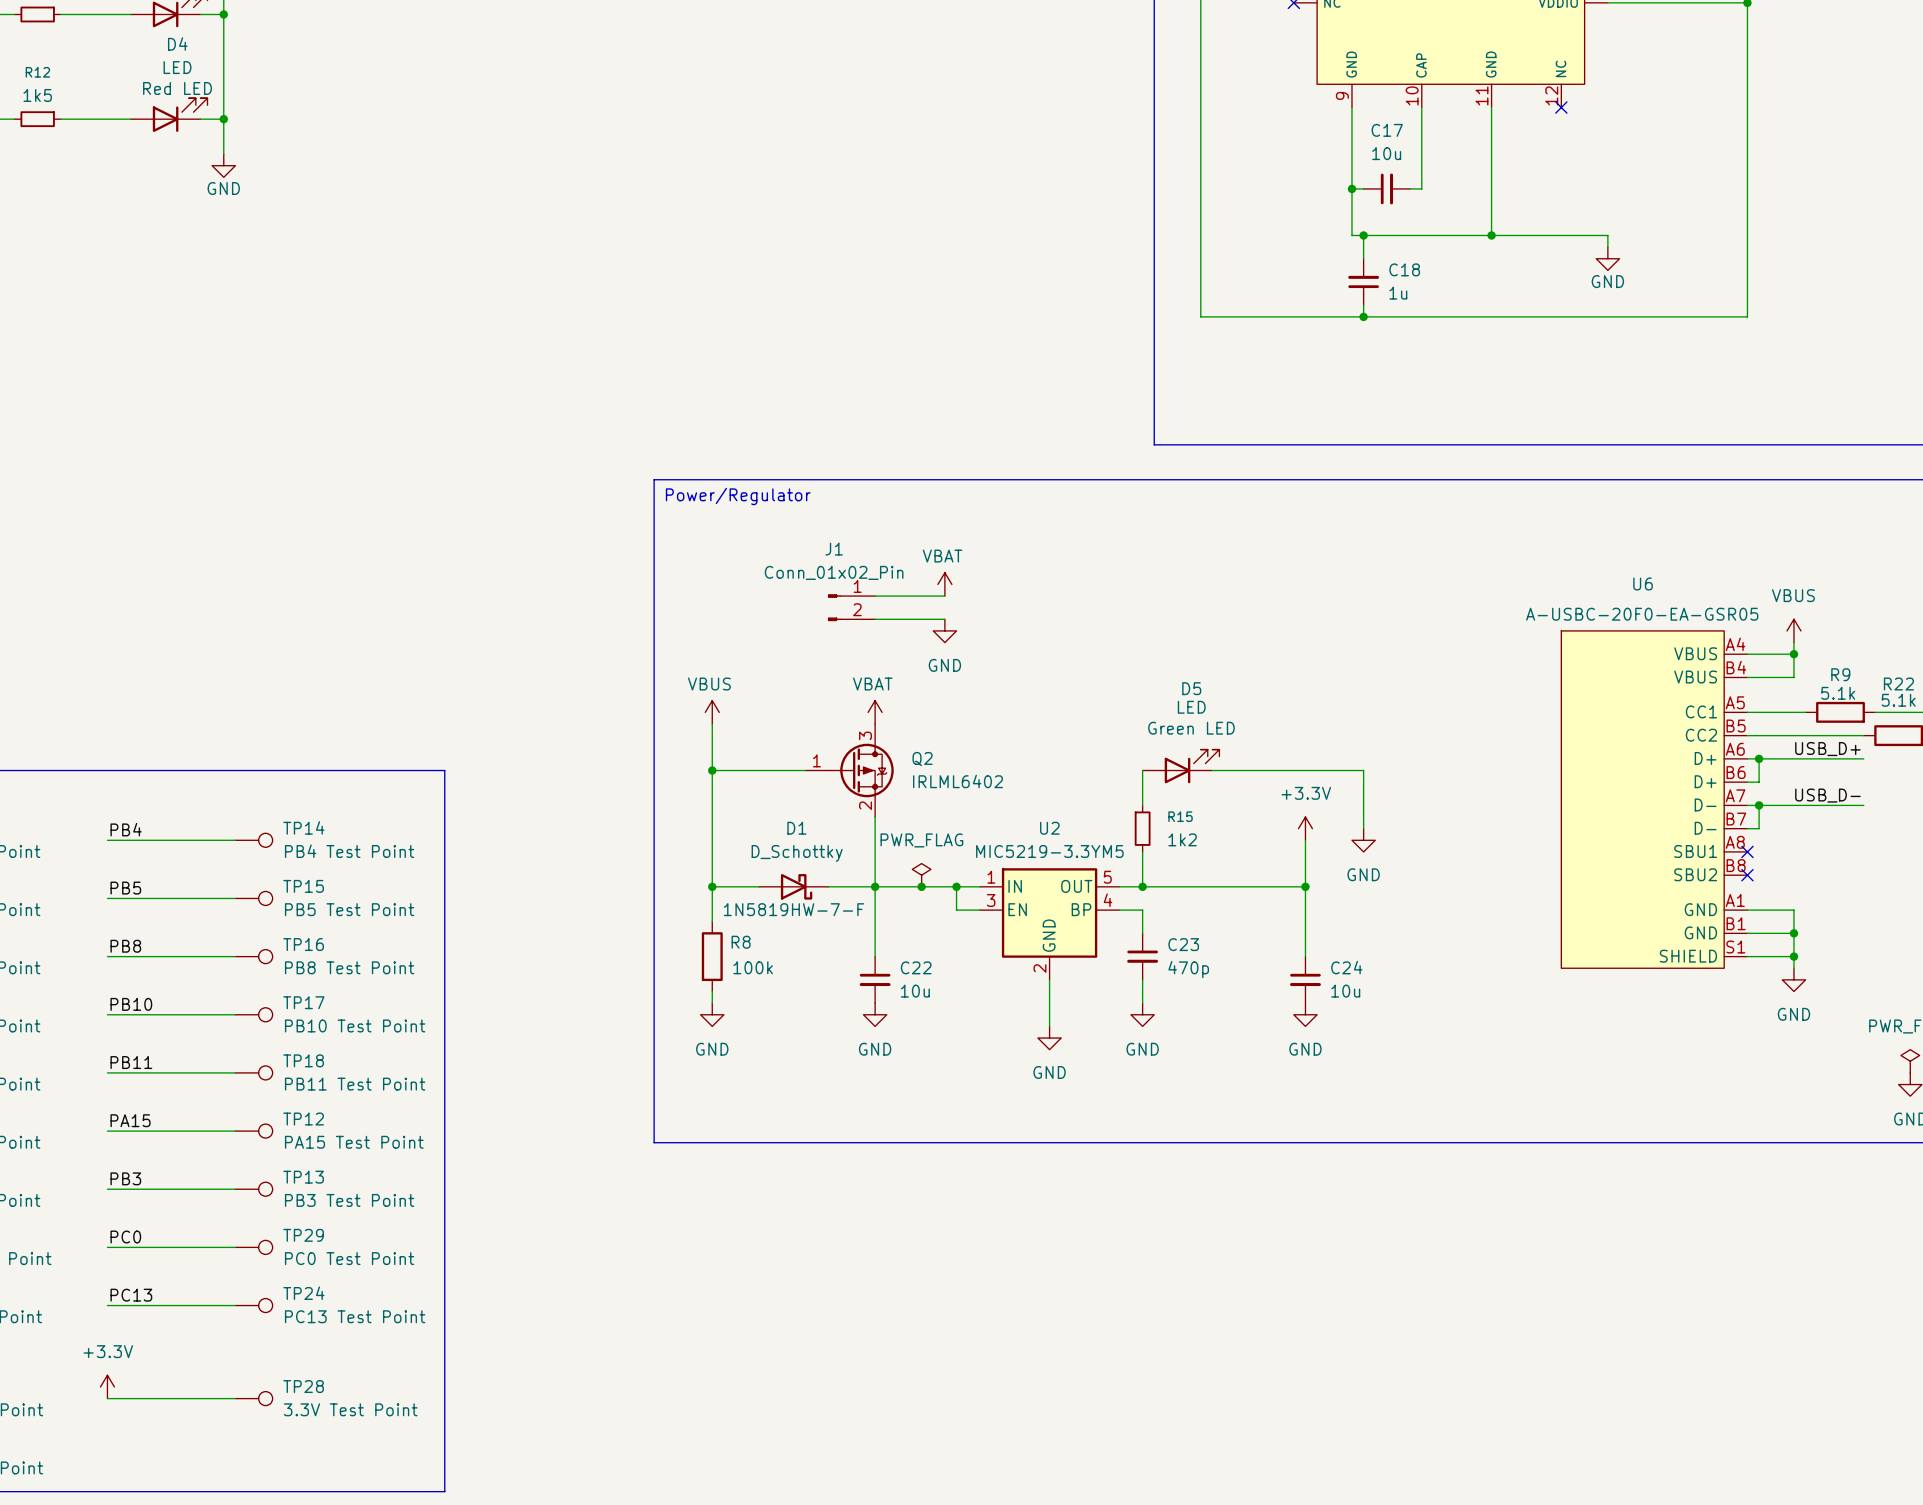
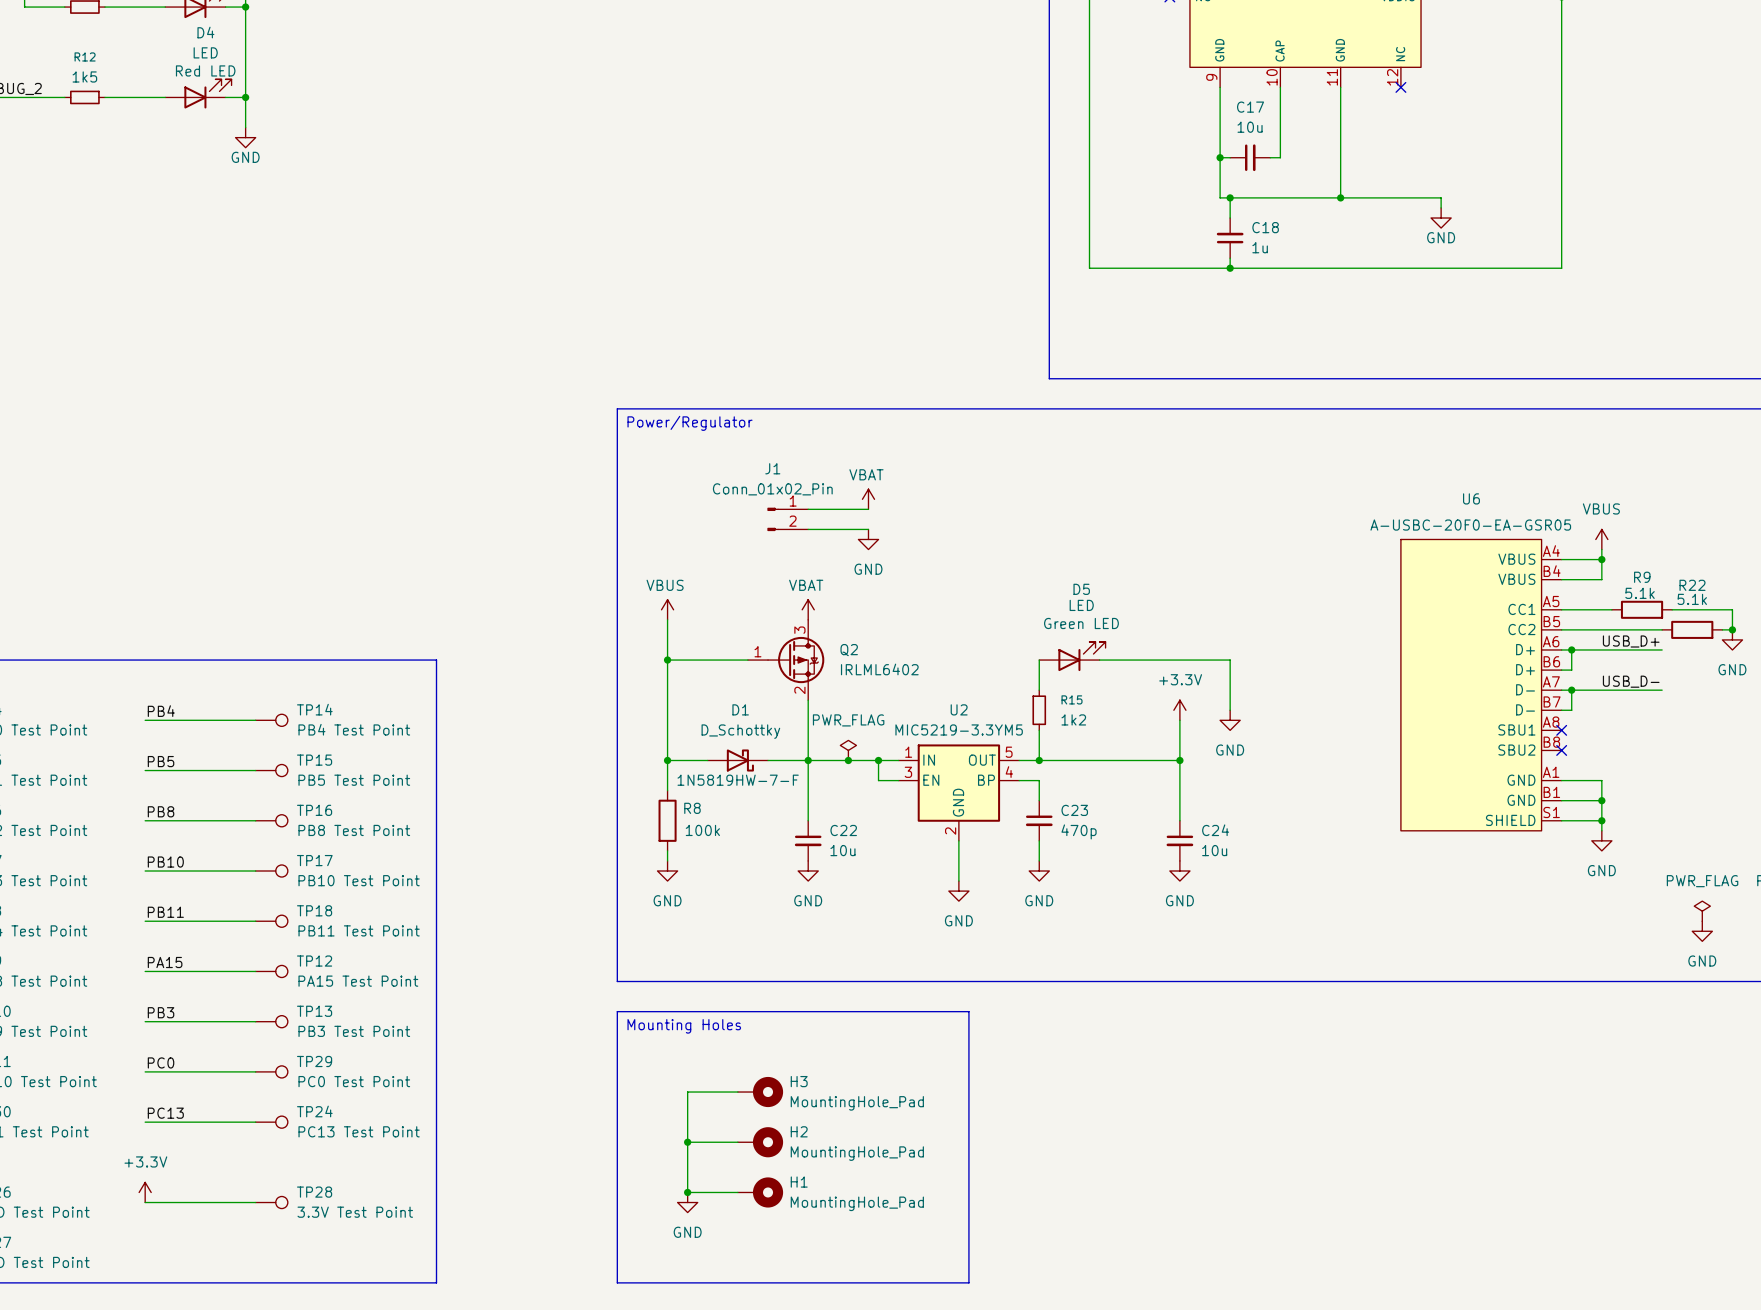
line: none -> (617, 1011) (968, 1011) (968, 1282) (617, 1282) (617, 1011)
text: none -> Mounting Holes (684, 1026)
wire: none -> (737, 1092) (687, 1092) (687, 1192) (737, 1192)
H3: none -> MountingHole_Pad (760, 1092)
wire: none -> (687, 1142) (737, 1142)
junction: none -> (687, 1142)
H2: none -> MountingHole_Pad (760, 1142)
junction: none -> (687, 1192)
H1: none -> MountingHole_Pad (760, 1192)
power symbol: none -> GND (687, 1202)

